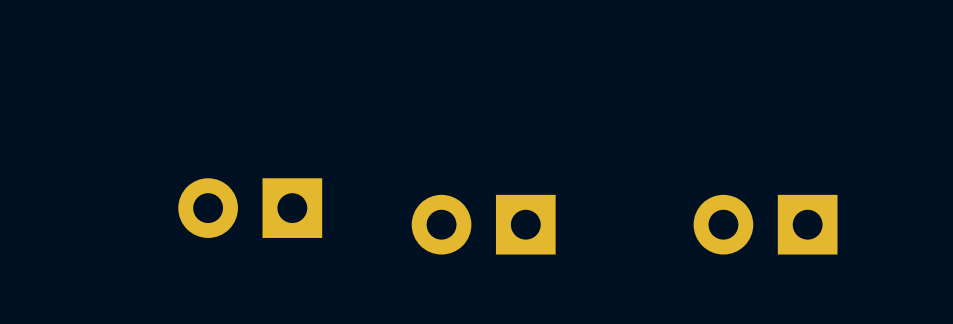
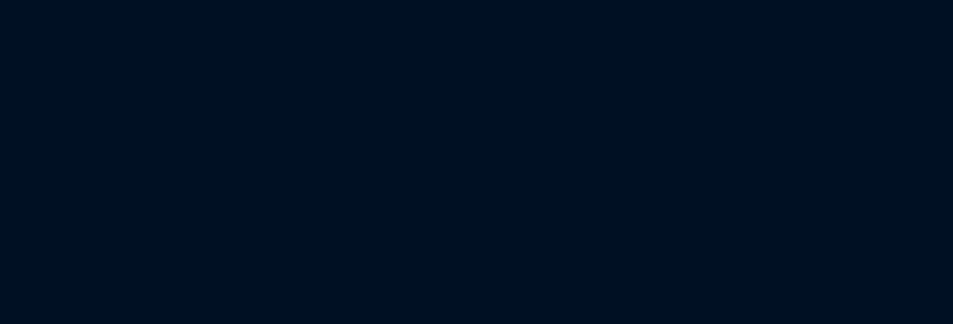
part: (250, 208) -> none
part: (483, 224) -> none
part: (765, 224) -> none

